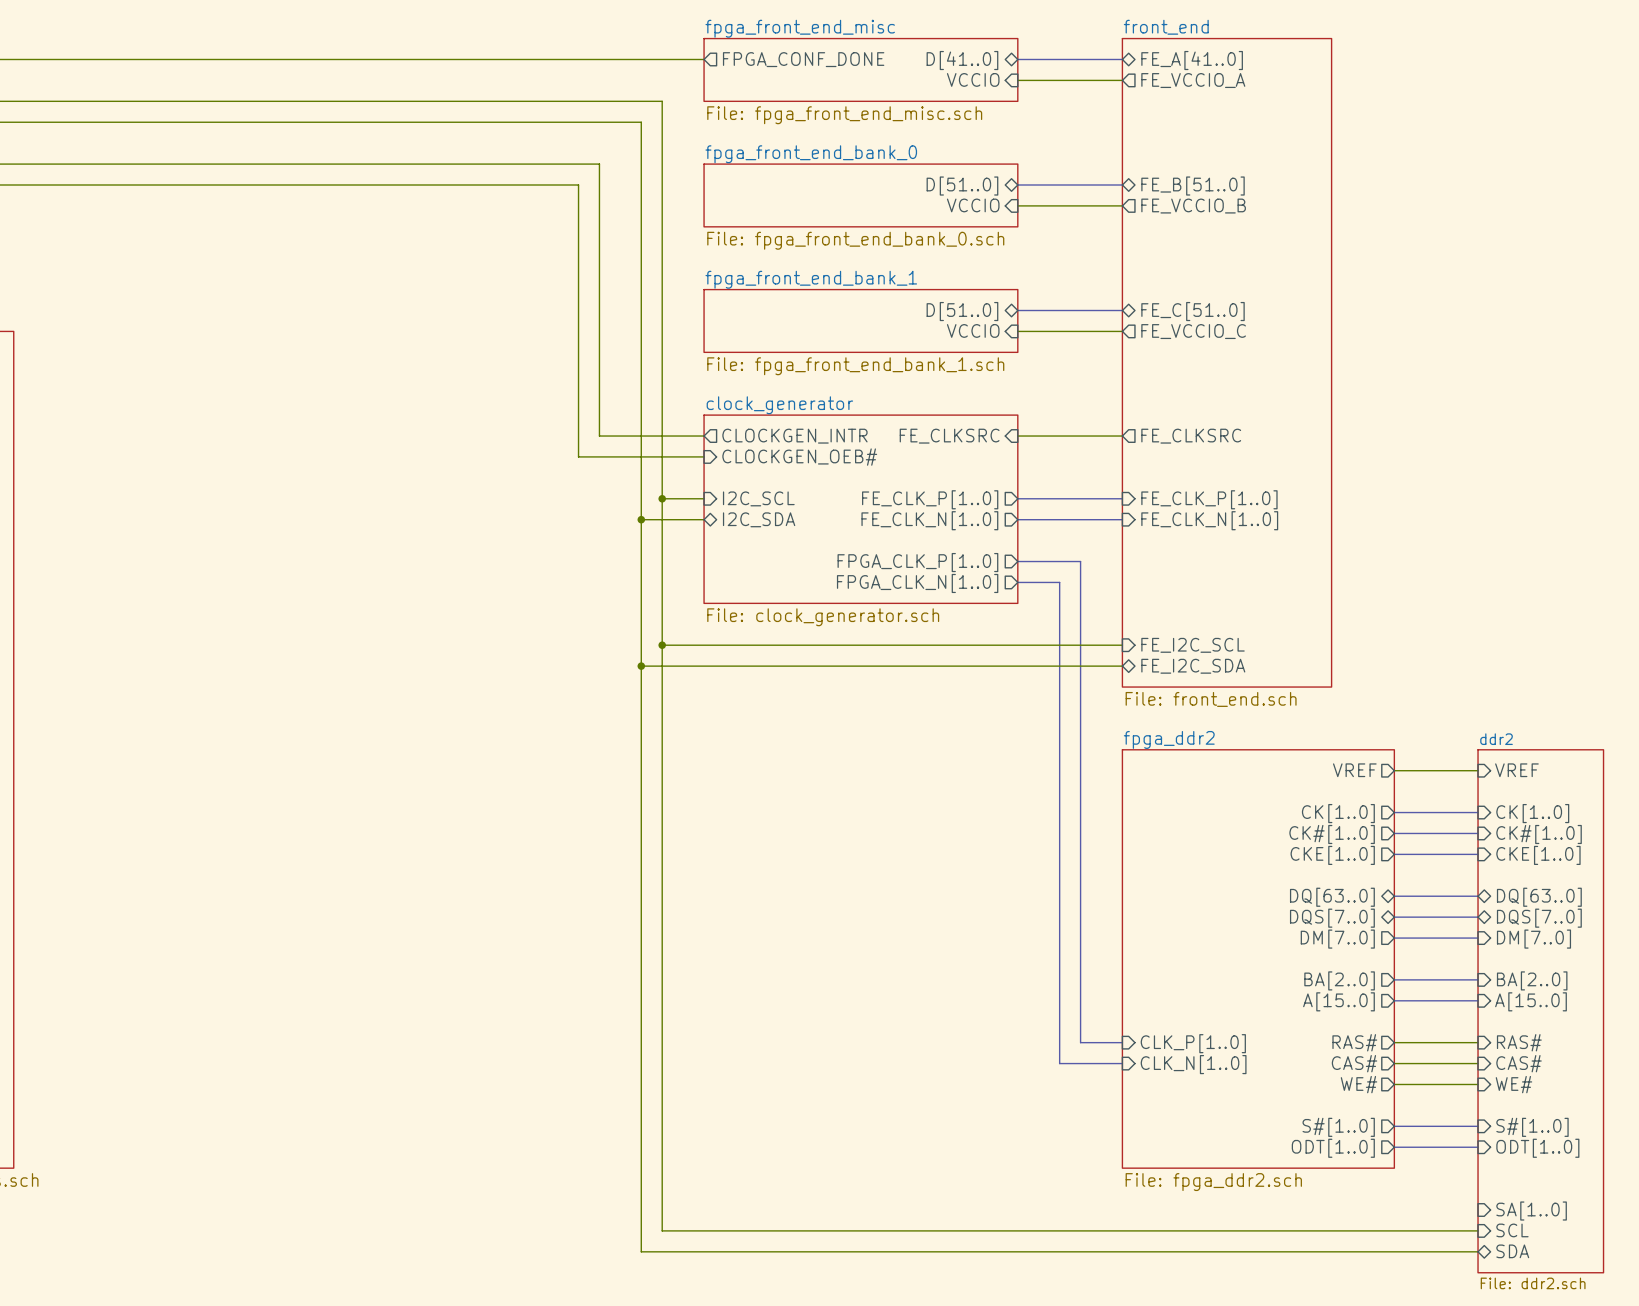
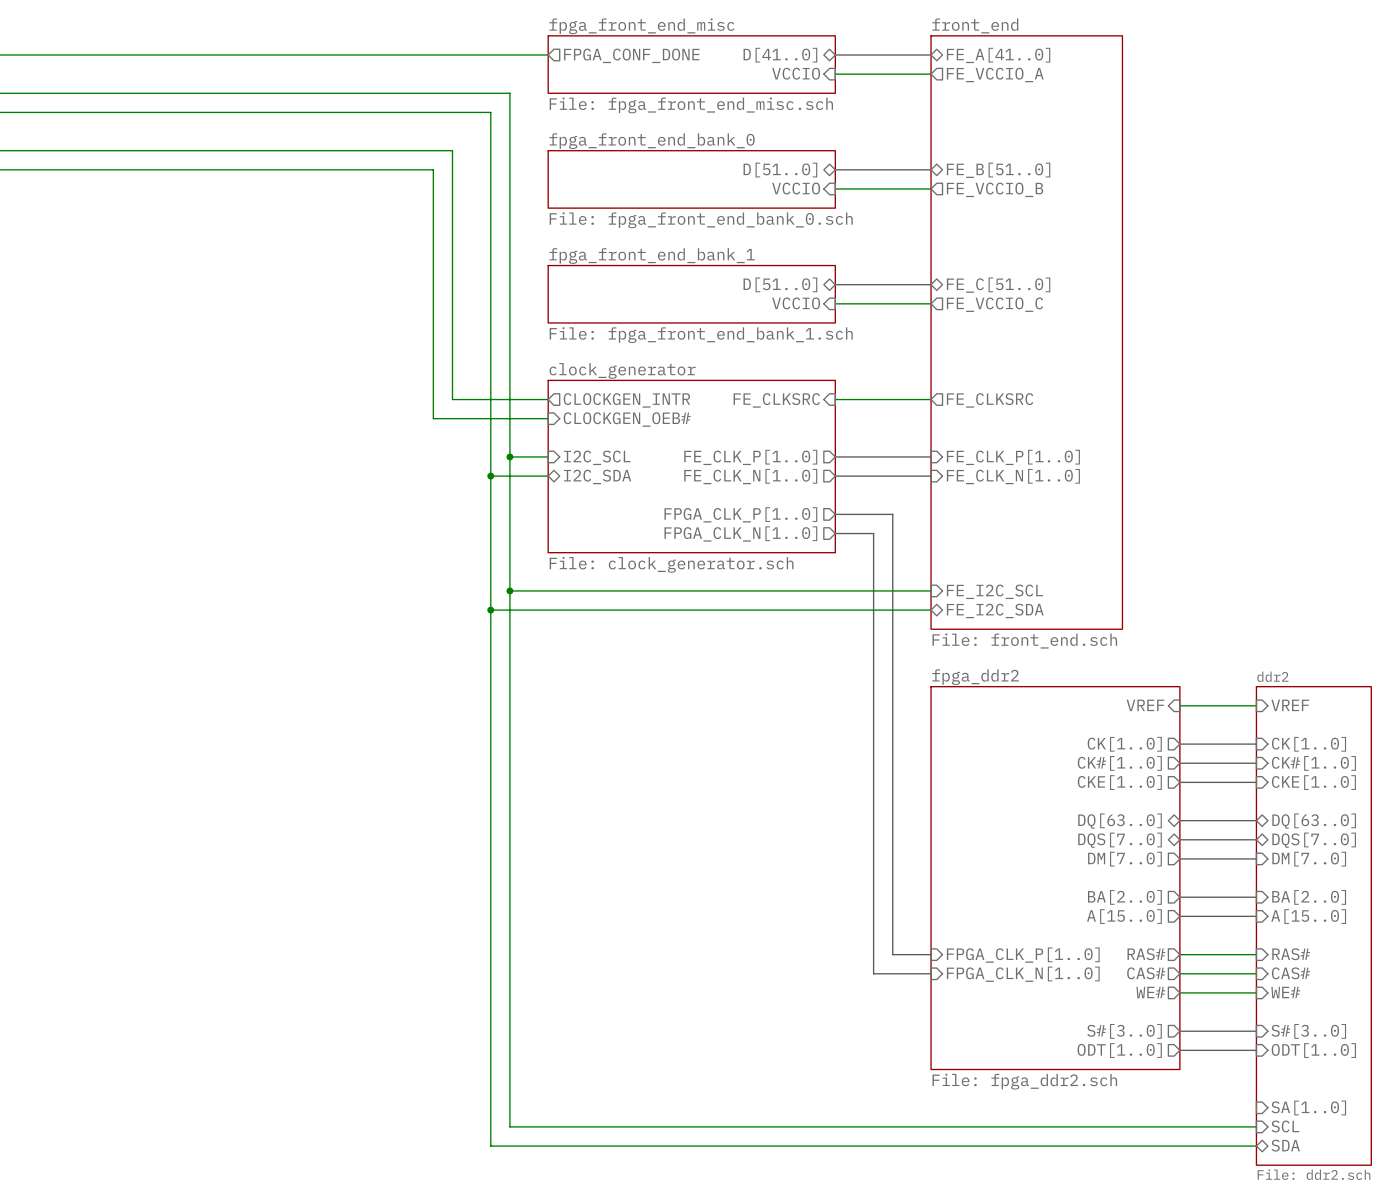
sheet pin shape: output (1354, 770) -> input (1145, 705)
sheet pin: CLK_P[1..0] (1193, 1043) -> FPGA_CLK_P[1..0] (1023, 955)
sheet pin: CLK_N[1..0] (1193, 1064) -> FPGA_CLK_N[1..0] (1023, 974)
sheet pin: S#[1..0] (1338, 1127) -> S#[3..0] (1124, 1031)
sheet pin: S#[1..0] (1532, 1127) -> S#[3..0] (1308, 1031)

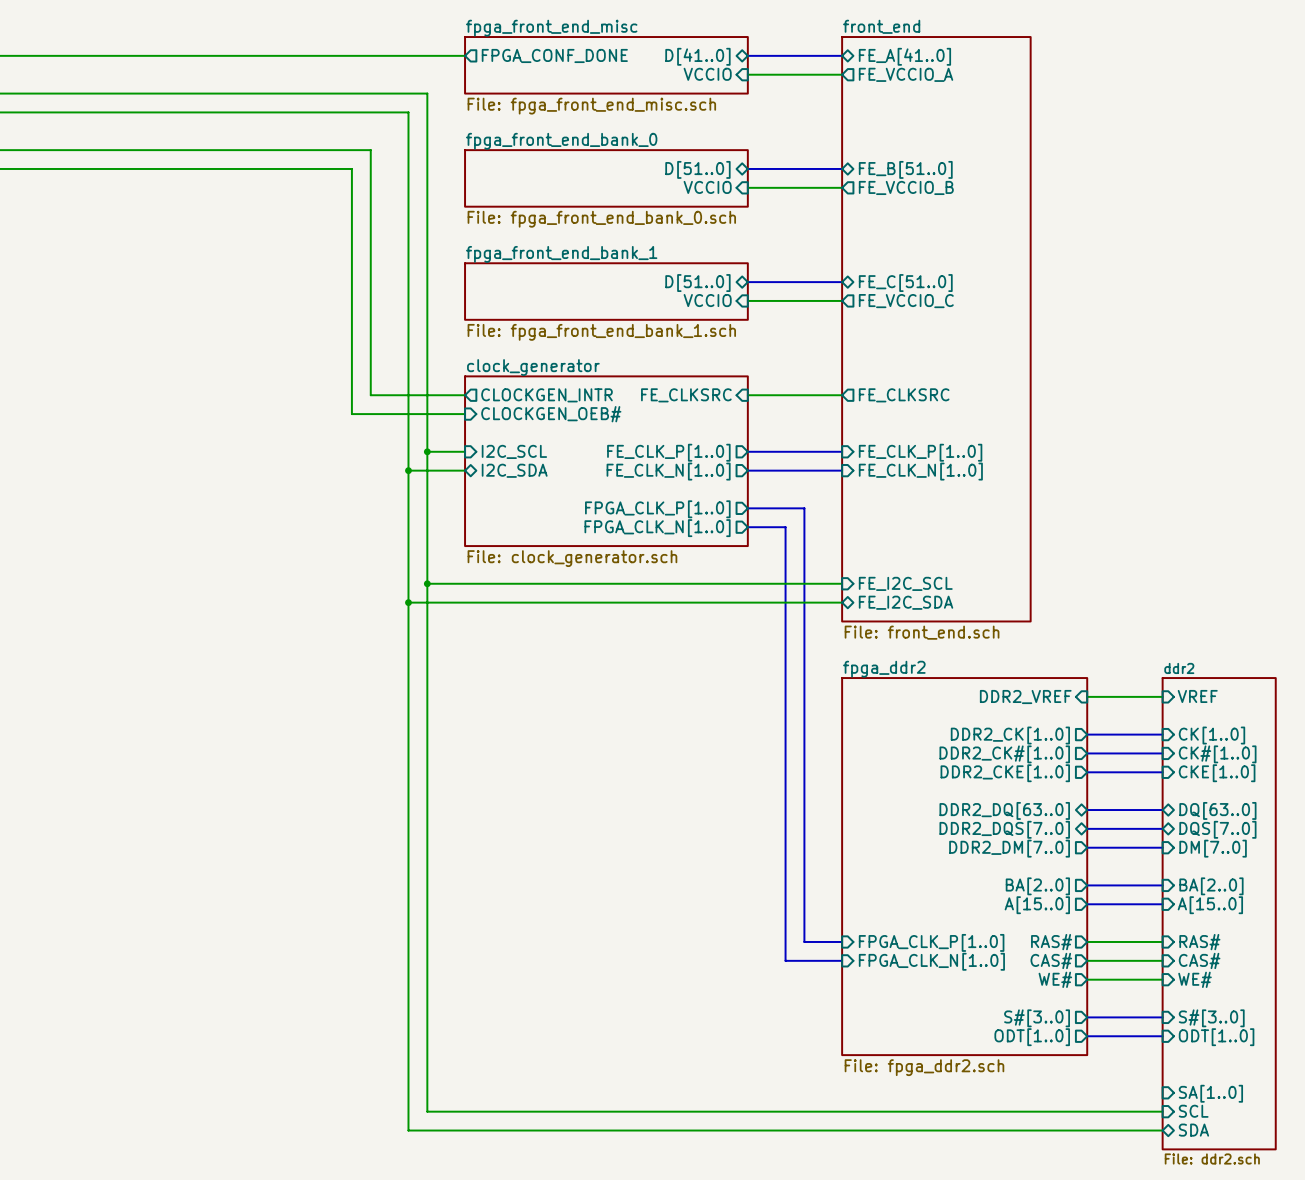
sheet pin: VREF (1145, 705) -> DDR2_VREF (1025, 697)
sheet pin: CK[1..0] (1124, 744) -> DDR2_CK[1..0] (1010, 735)
sheet pin: CK#[1..0] (1119, 763) -> DDR2_CK#[1..0] (1004, 754)
sheet pin: CKE[1..0] (1119, 782) -> DDR2_CKE[1..0] (1005, 773)
sheet pin: DQ[63..0] (1120, 821) -> DDR2_DQ[63..0] (1004, 810)
sheet pin: DQS[7..0] (1120, 840) -> DDR2_DQS[7..0] (1004, 829)
sheet pin: DM[7..0] (1124, 859) -> DDR2_DM[7..0] (1009, 848)

